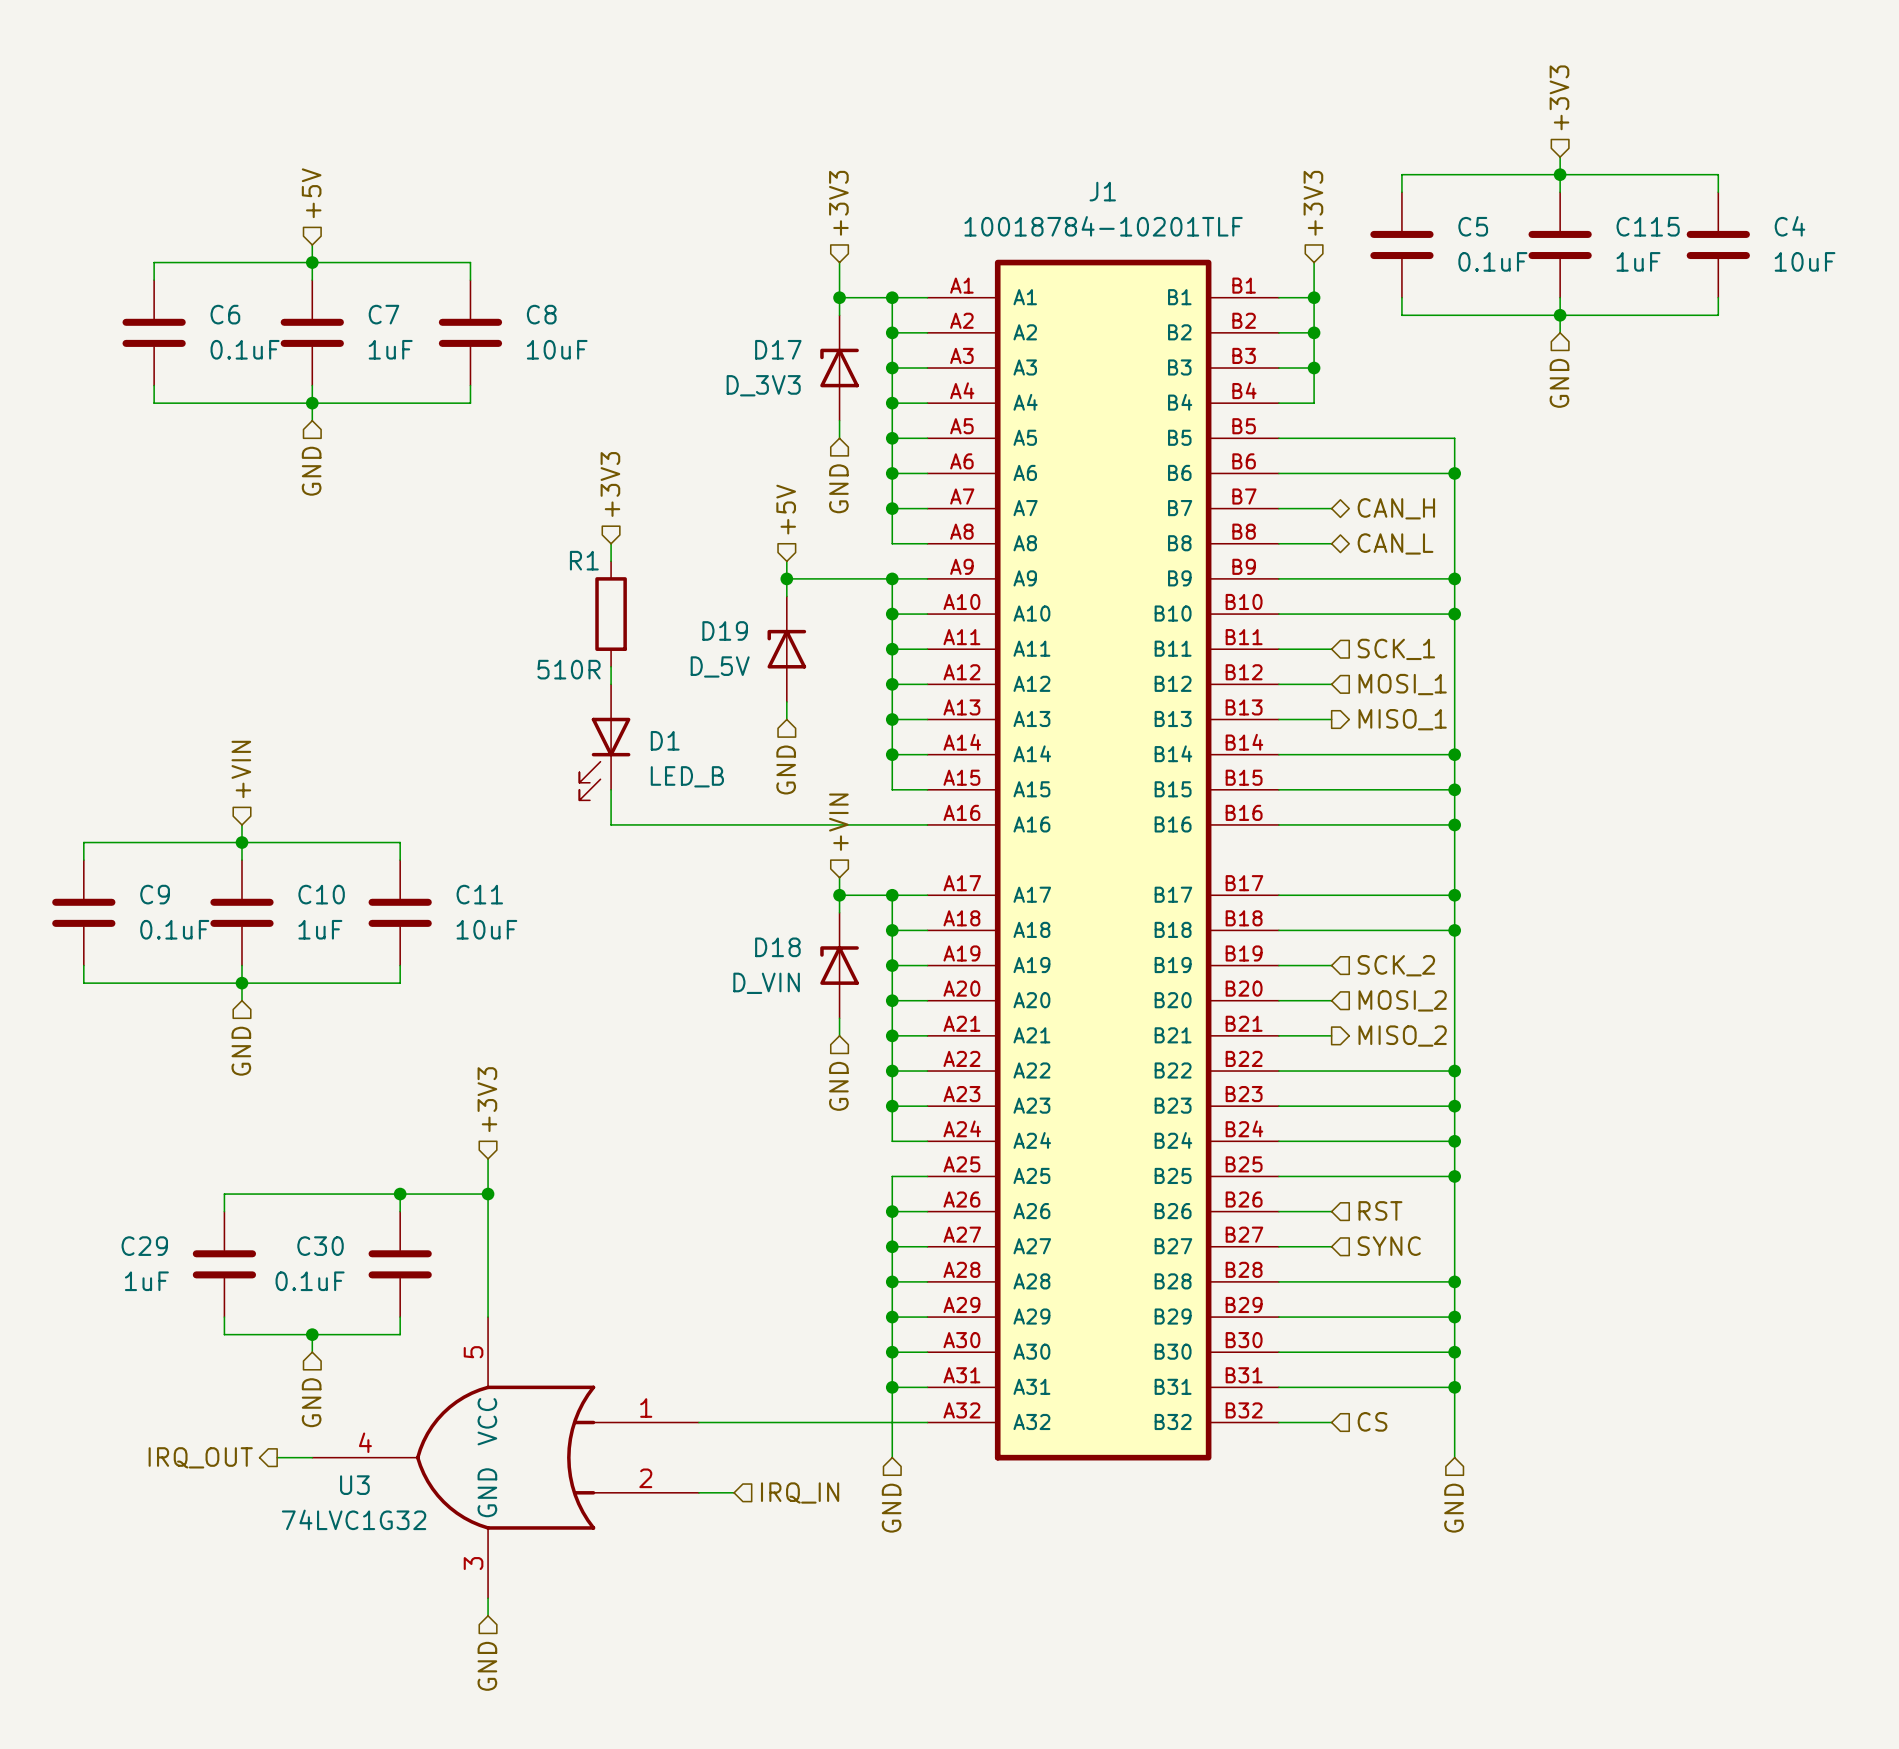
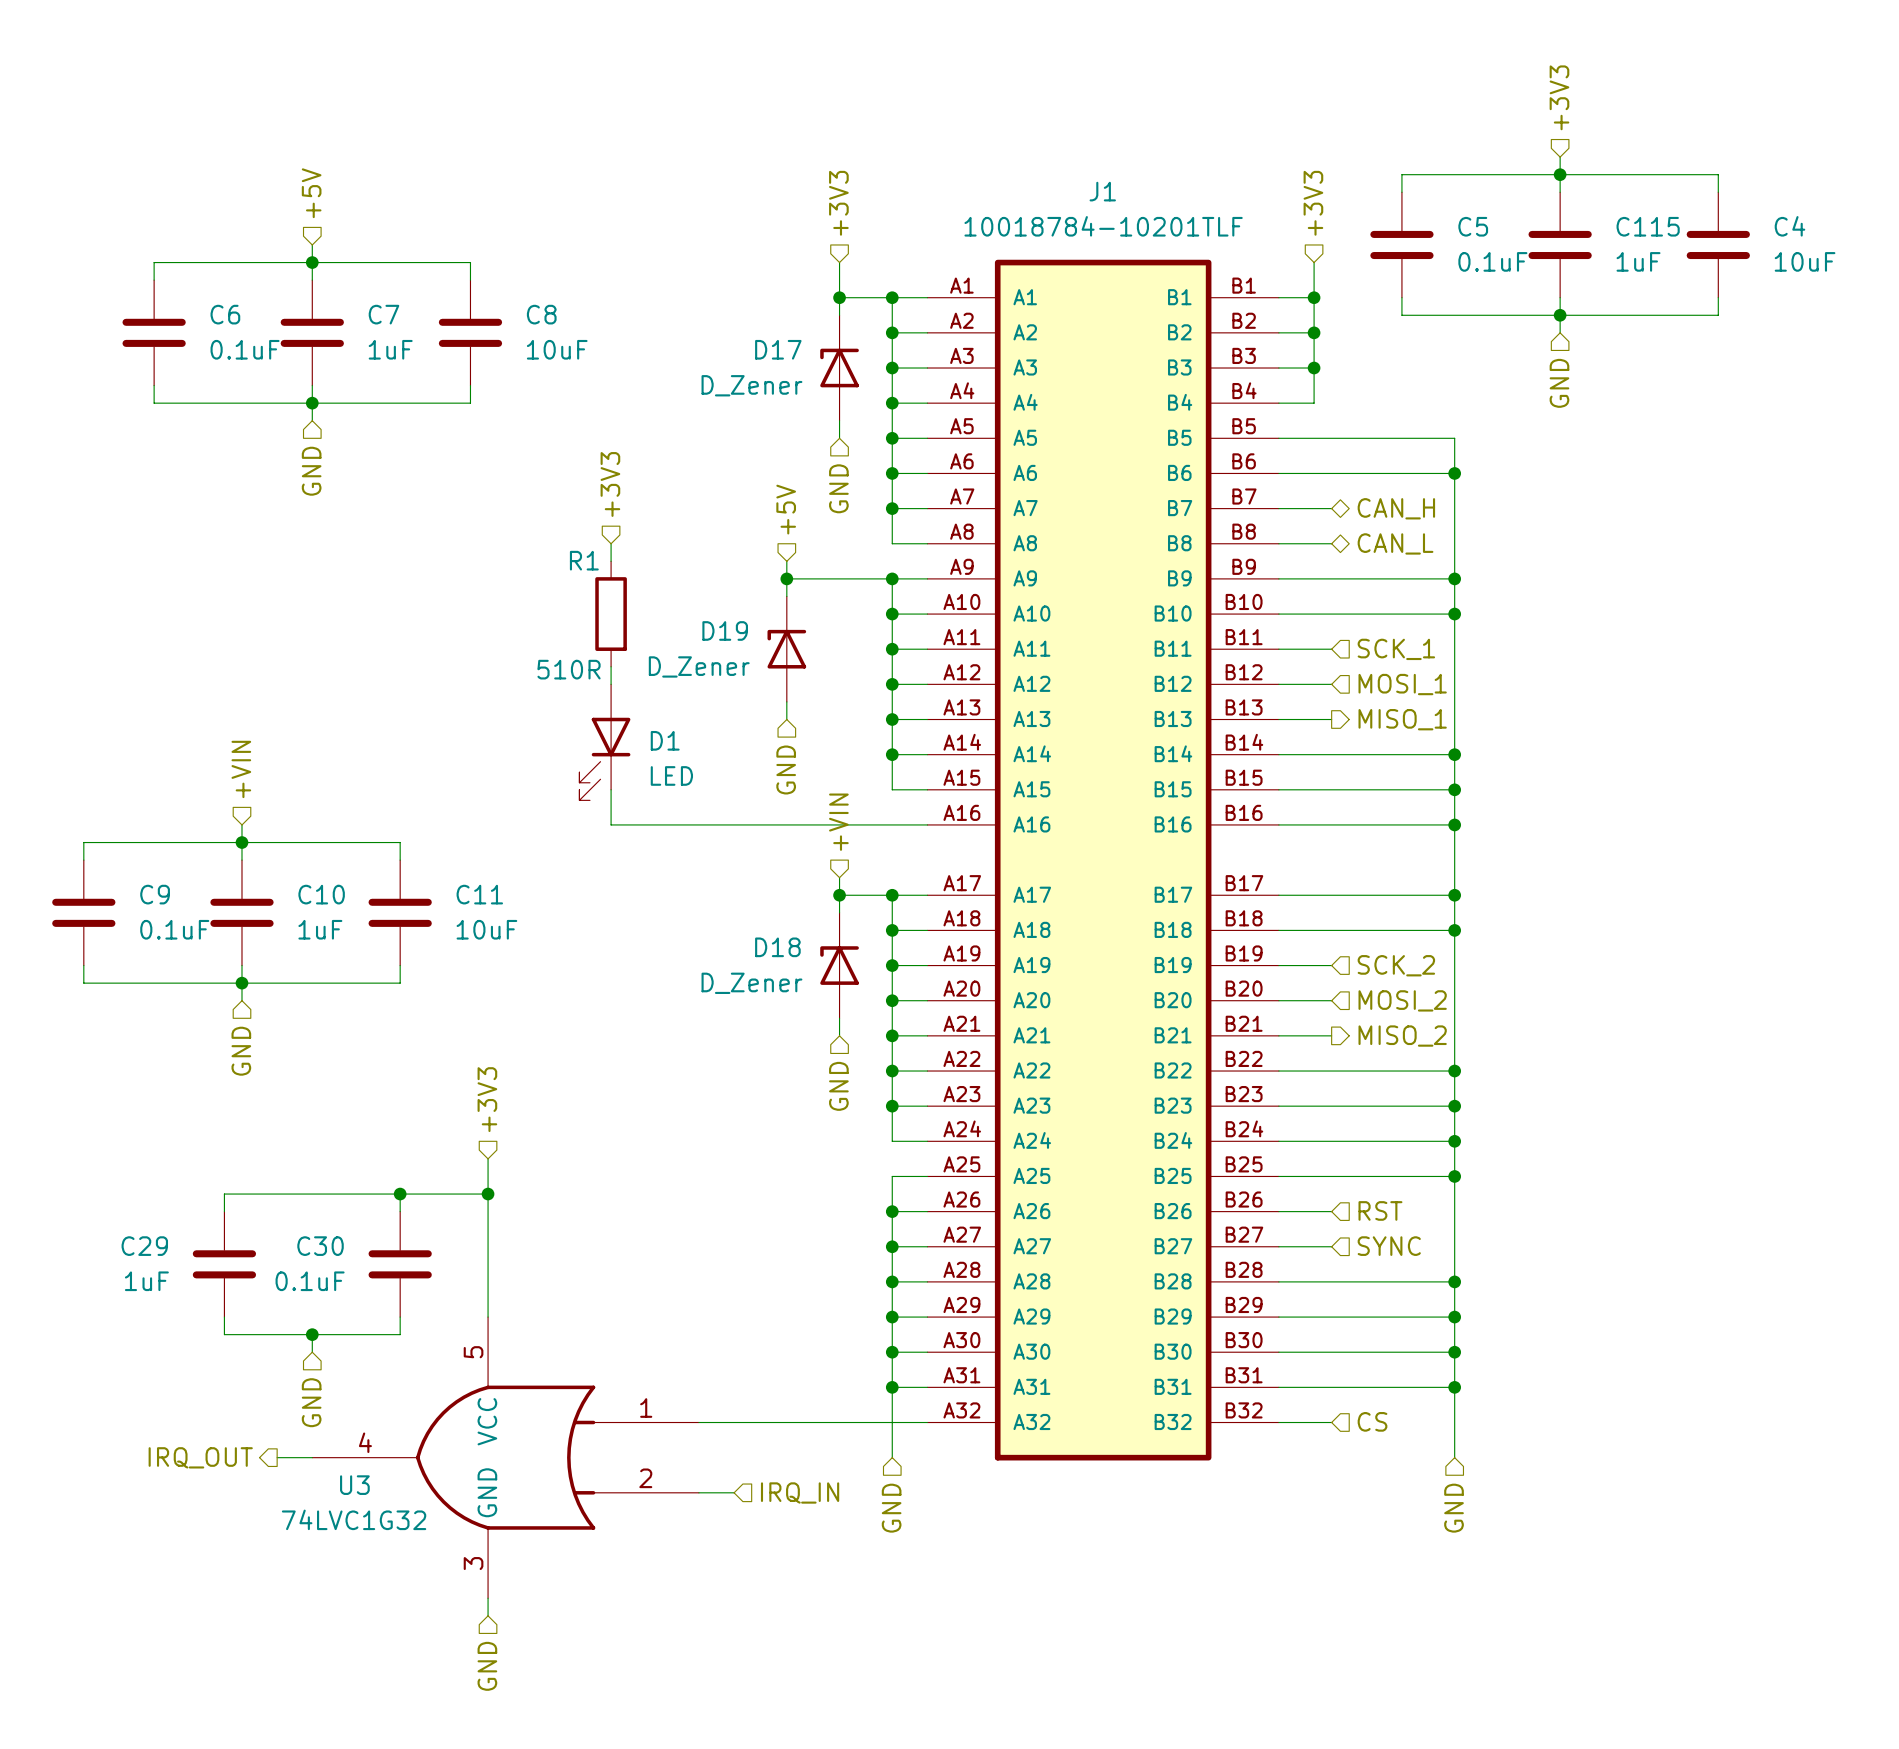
D17 value: D_3V3 (763, 385) -> D_Zener (751, 385)
D19 value: D_5V (720, 666) -> D_Zener (699, 666)
D1 value: LED_B (687, 776) -> LED (671, 775)
D18 value: D_VIN (766, 983) -> D_Zener (751, 983)

